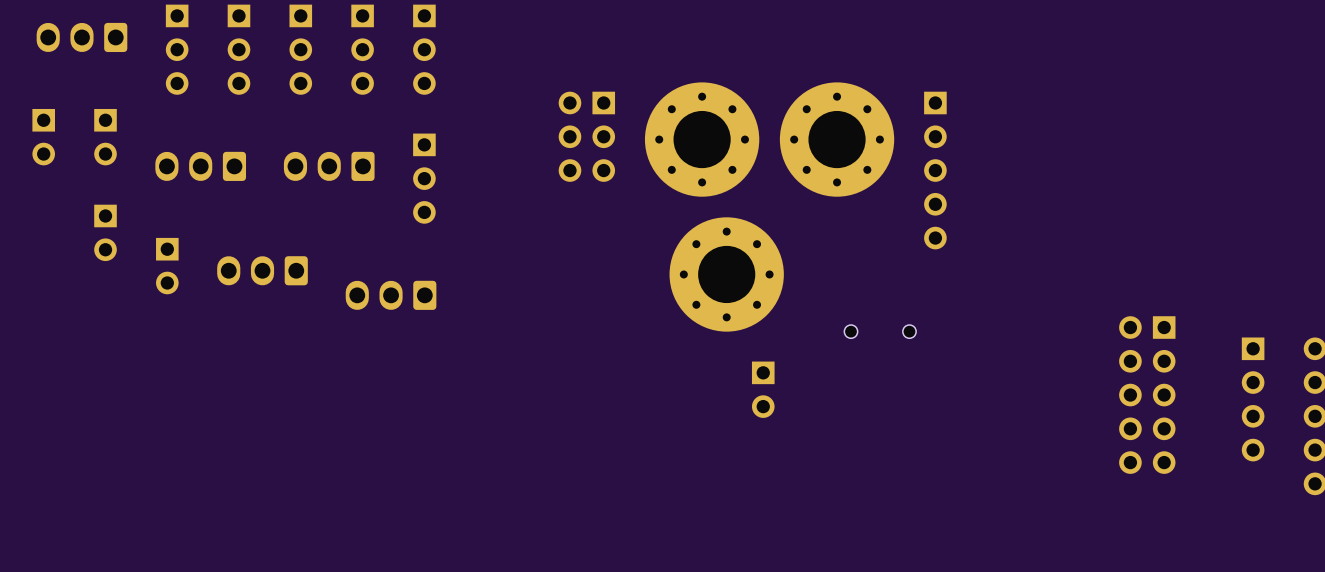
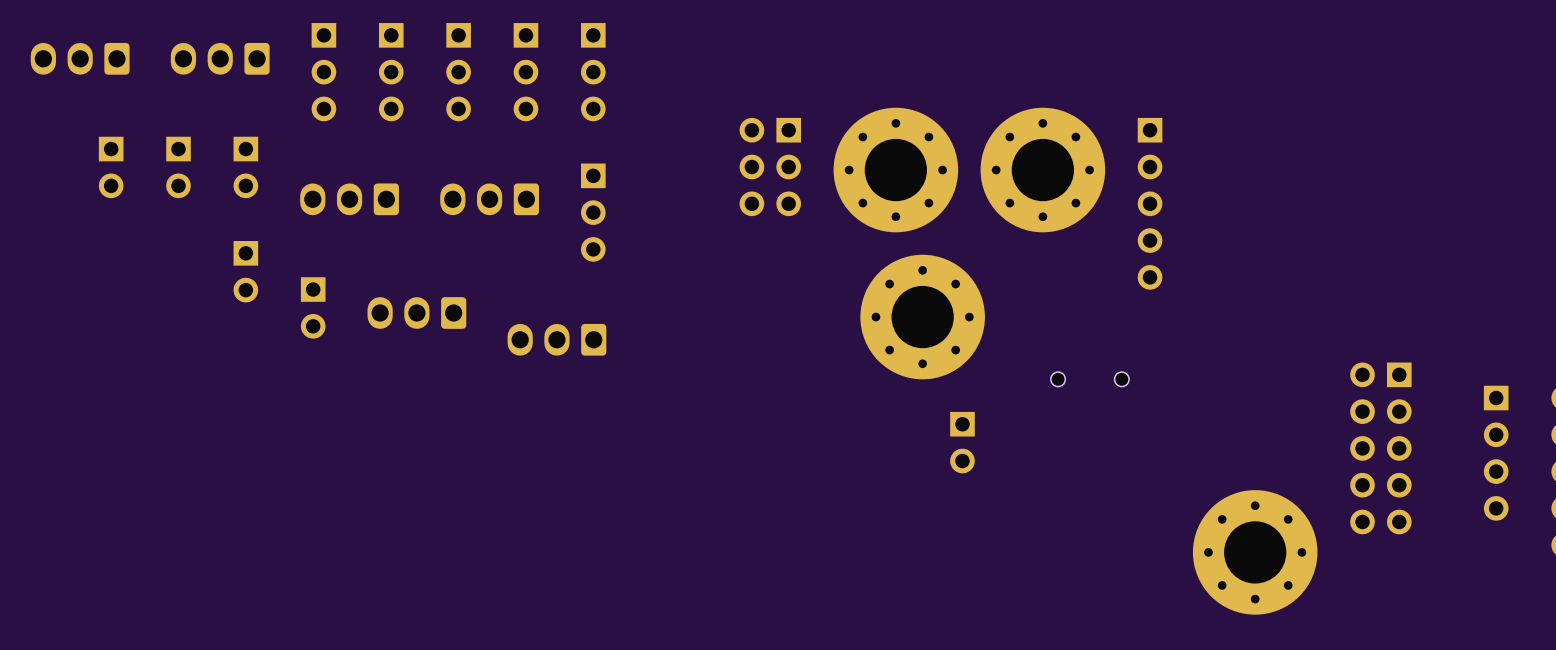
part: none -> (1255, 552)

